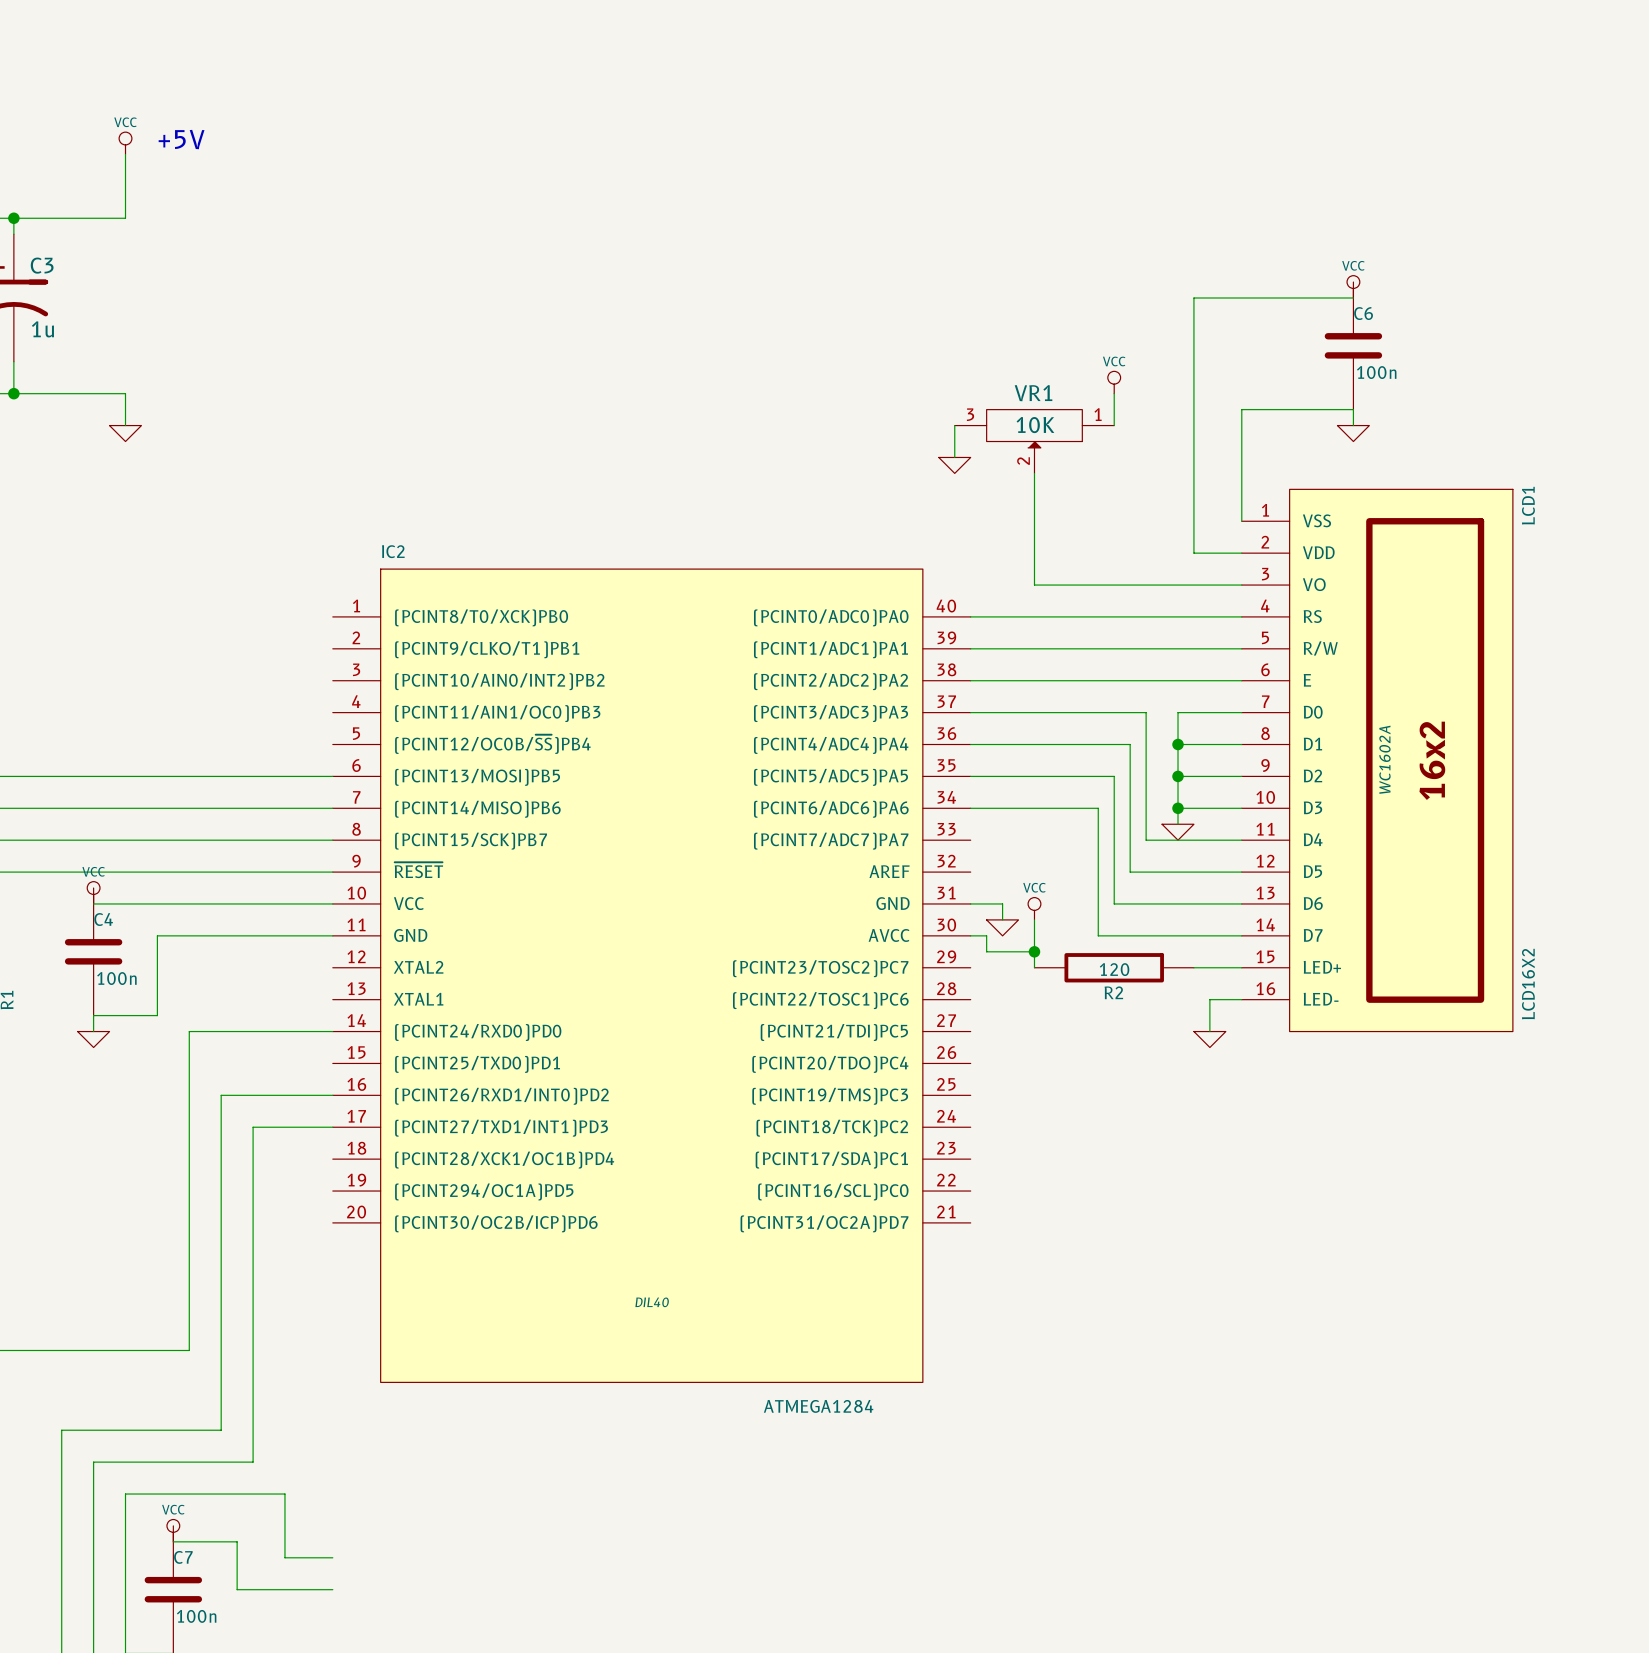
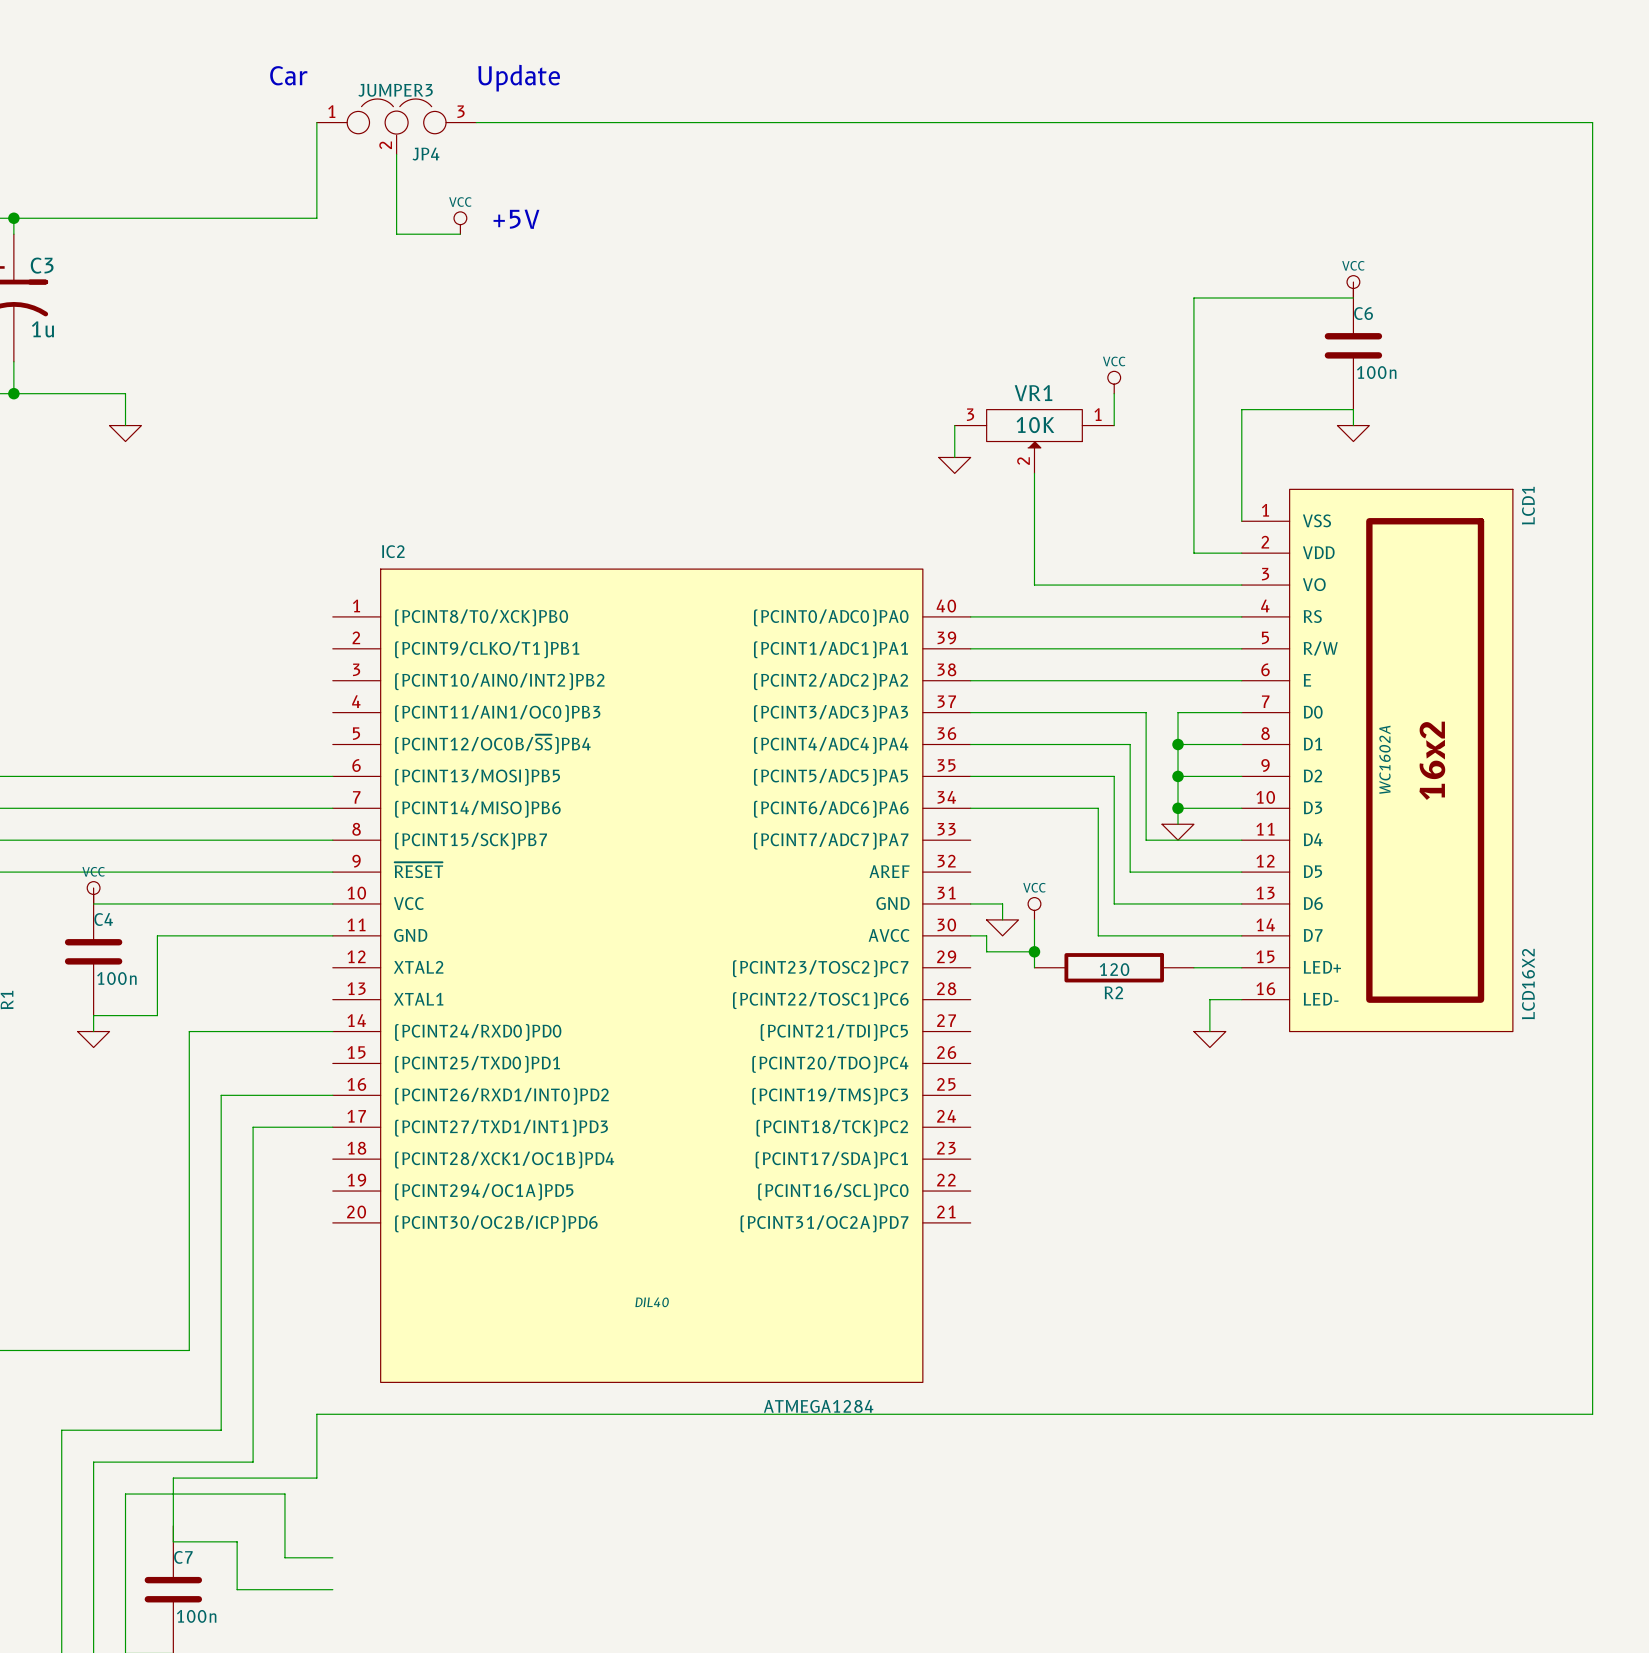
text: none -> Car (288, 75)
text: none -> Update (519, 78)
wire: none -> (476, 122) (1592, 122) (1592, 1414) (316, 1414) (316, 1478) (173, 1478) (173, 1541)
JP4: none -> JUMPER3 (396, 126)
text: +5V (181, 139) -> none
power symbol: VCC (125, 143) -> none
wire: (125, 154) (125, 218) -> (316, 122) (316, 218) (125, 218)
wire: none -> (396, 154) (396, 234) (460, 234)
text: none -> +5V (516, 219)
power symbol: none -> VCC (460, 223)
power symbol: VCC (173, 1530) -> none

